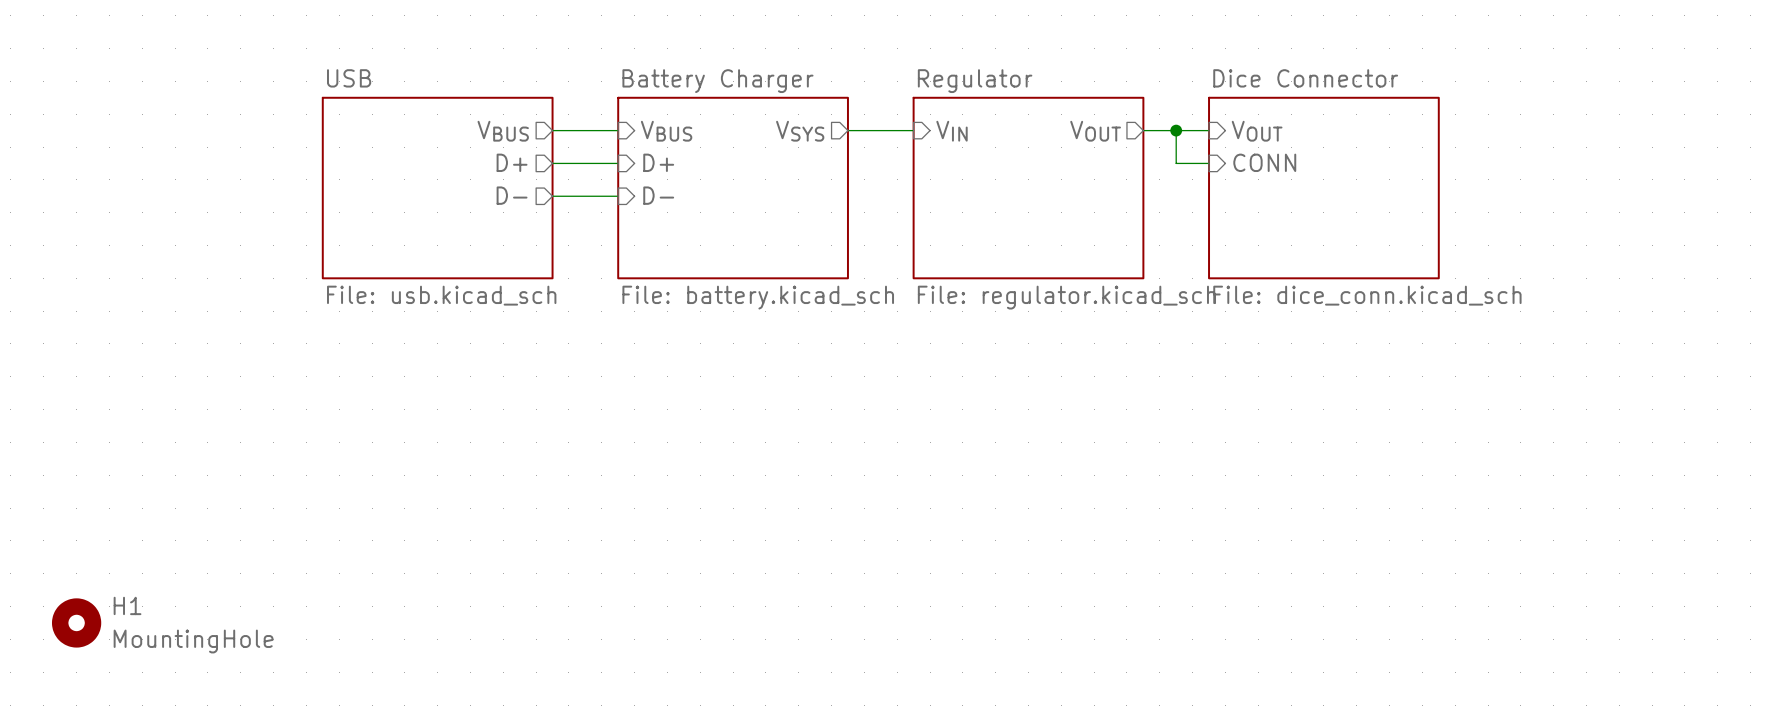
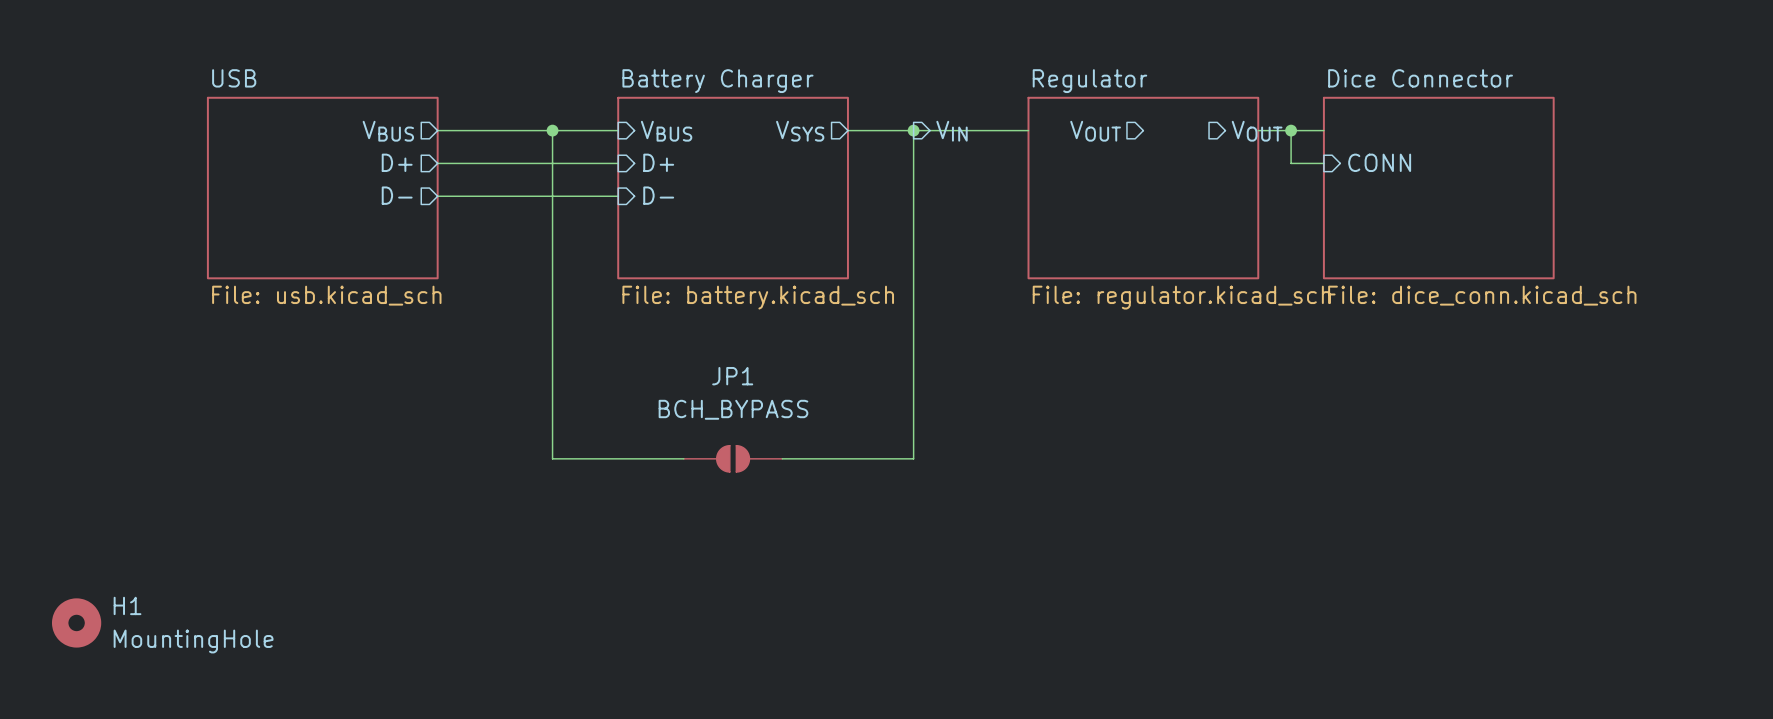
wire: none -> (437, 130) (552, 130) (552, 458) (683, 458)
junction: none -> (552, 130)
junction: none -> (913, 130)
wire: none -> (1028, 130) (913, 130) (913, 458) (782, 458)
wire: (1143, 130) (1209, 130) -> (1258, 130) (1323, 130)
wire: (1176, 130) (1176, 163) (1209, 163) -> (1291, 130) (1291, 163) (1323, 163)
junction: (1176, 130) -> none
junction: none -> (1291, 130)
sheet pin position: VBUS (503, 131) -> VBUS (388, 131)
sheet pin position: D+ (512, 162) -> D+ (397, 162)
sheet pin position: CONN (1264, 162) -> CONN (1379, 162)
wire: none -> (437, 163) (552, 163)
sheet USB position: (437, 188) -> (322, 188)
sheet Regulator position: (1028, 188) -> (1143, 188)
sheet Dice Connector position: (1323, 188) -> (1438, 188)
sheet pin position: D- (512, 195) -> D- (397, 195)
wire: none -> (437, 196) (552, 196)
JP1: none -> BCH_BYPASS (733, 458)

